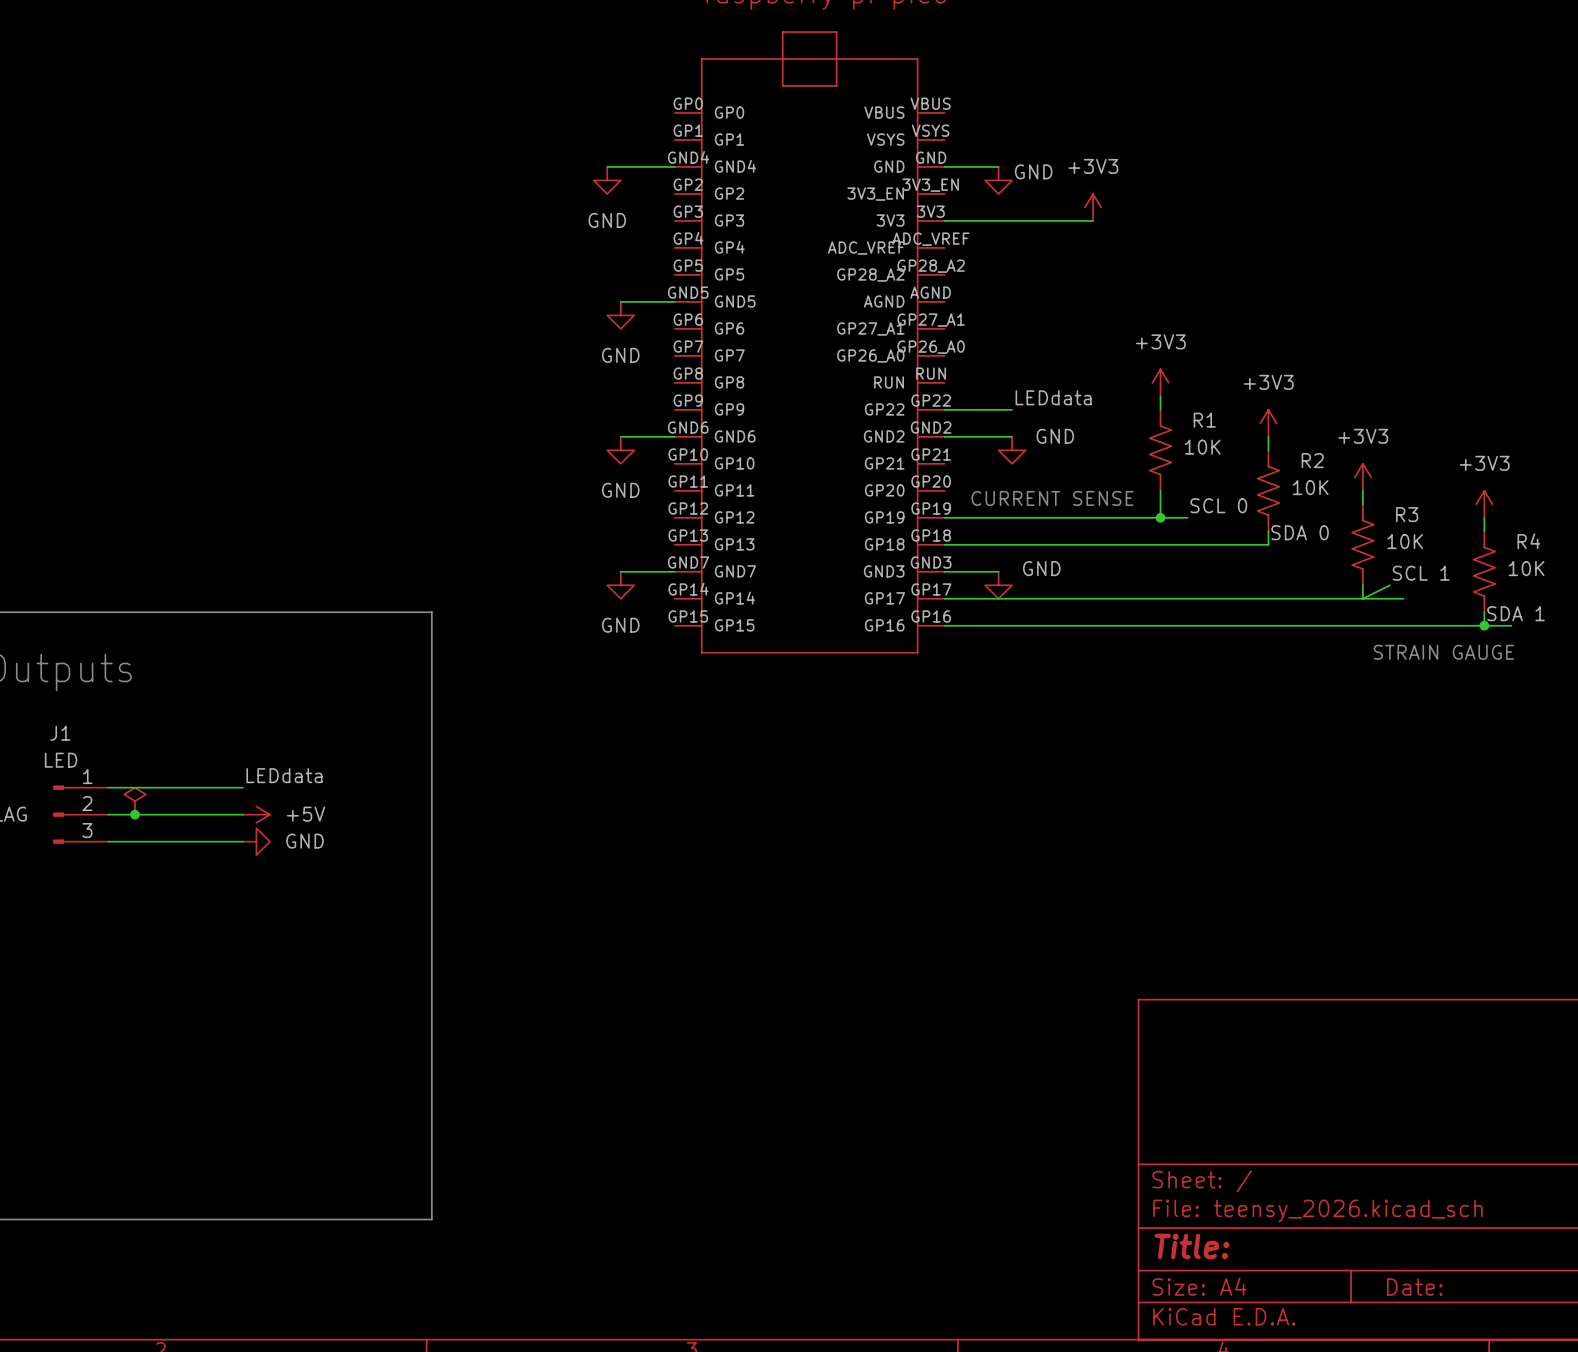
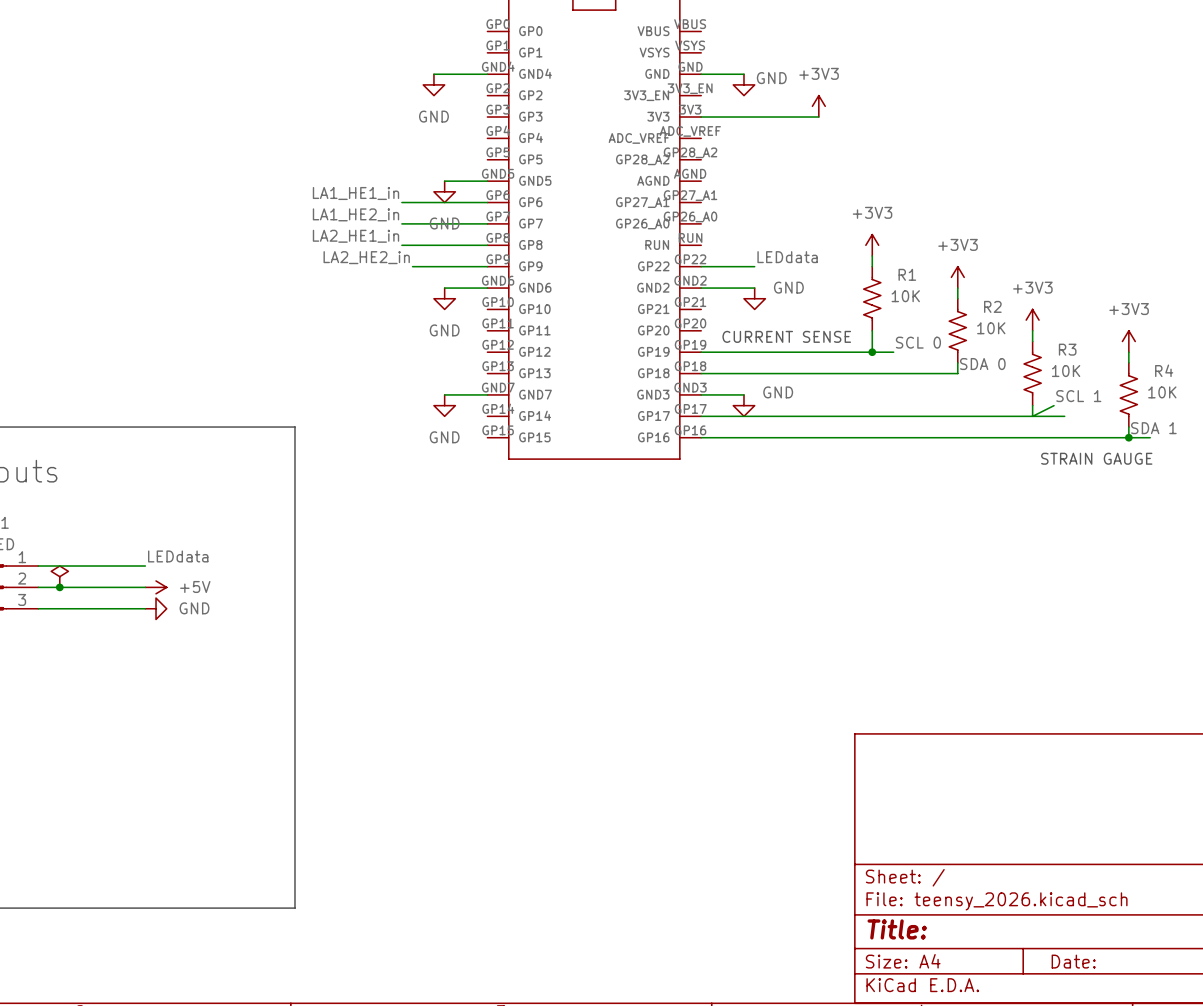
label: none -> LA1_HE1_in (355, 193)
wire: none -> (401, 202) (487, 202)
label: none -> LA1_HE2_in (355, 214)
wire: none -> (401, 223) (487, 223)
label: none -> LA2_HE1_in (355, 236)
wire: none -> (401, 245) (487, 245)
label: none -> LA2_HE2_in (366, 257)
wire: none -> (412, 266) (487, 266)

